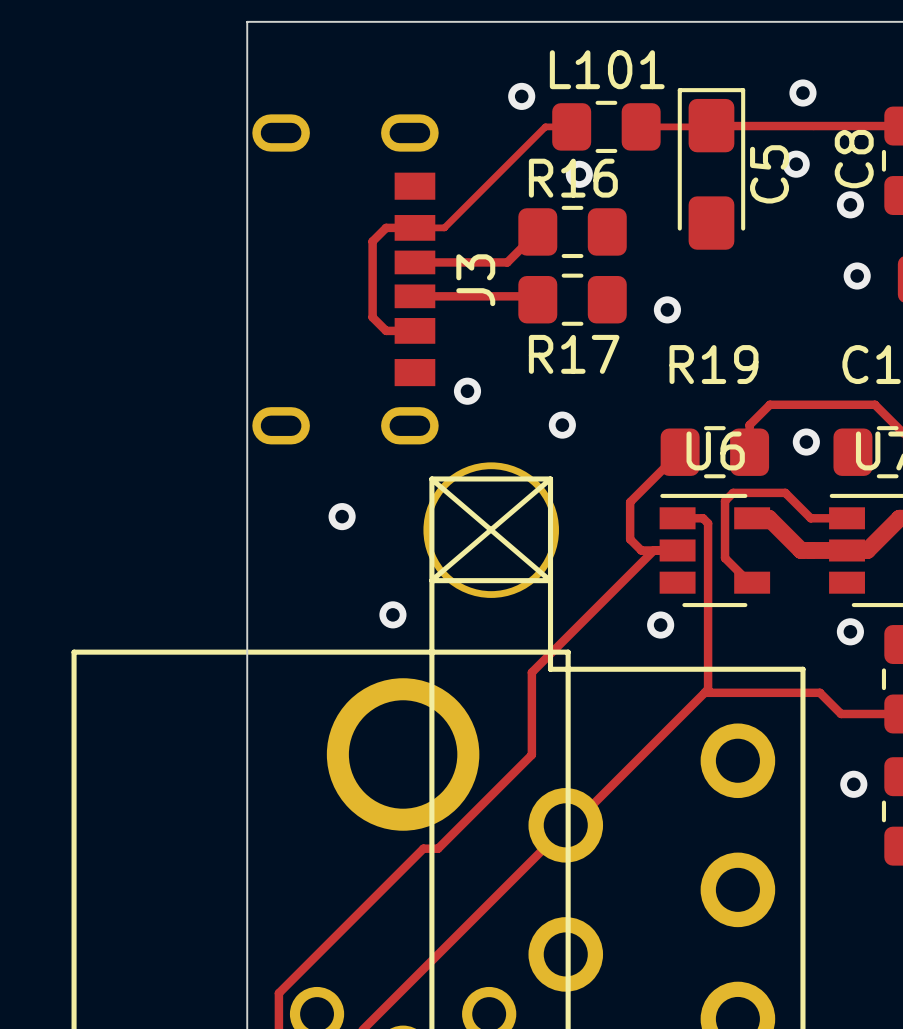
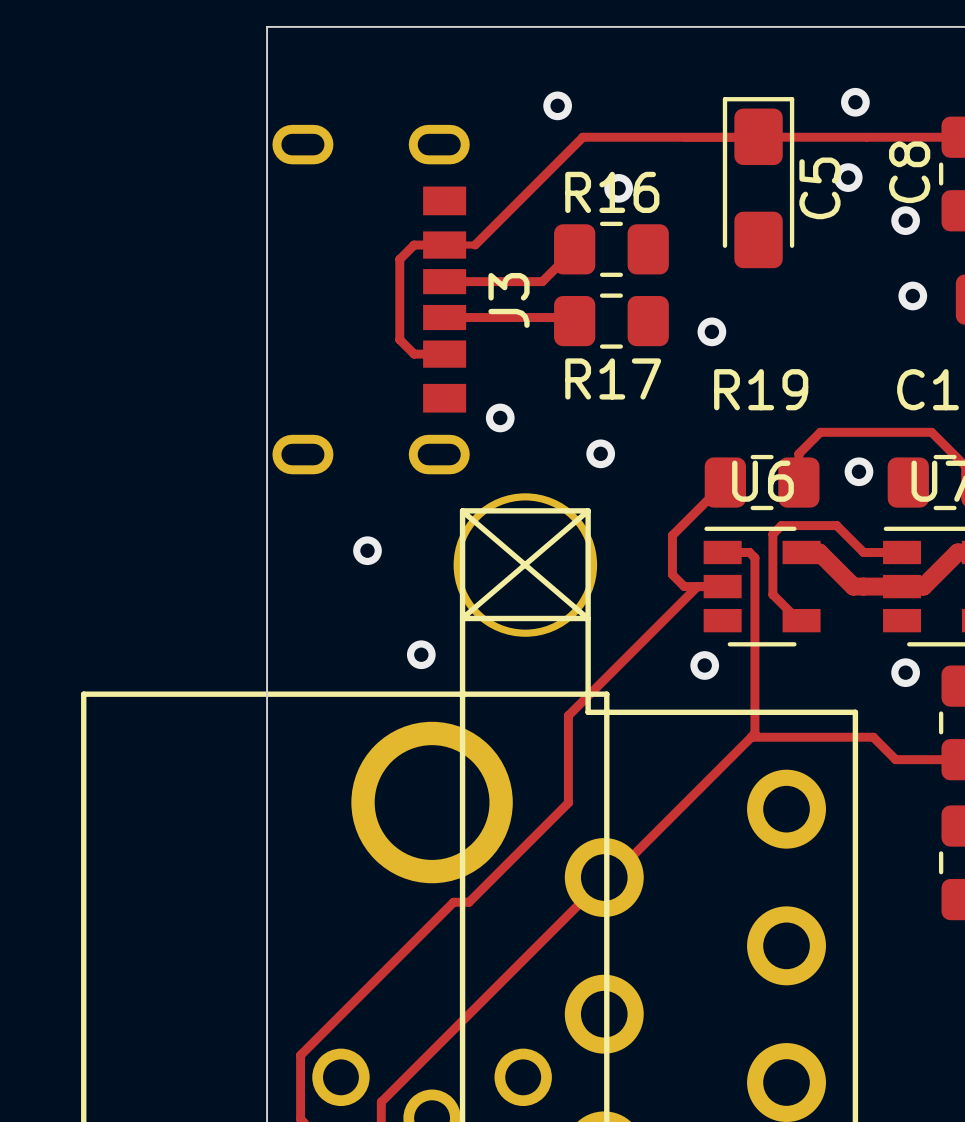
track: (571, 126) (545, 126) (444, 227) -> (758, 137) (582, 137) (475, 245)
L101: (606, 126) -> none
via: (853, 784) -> none

